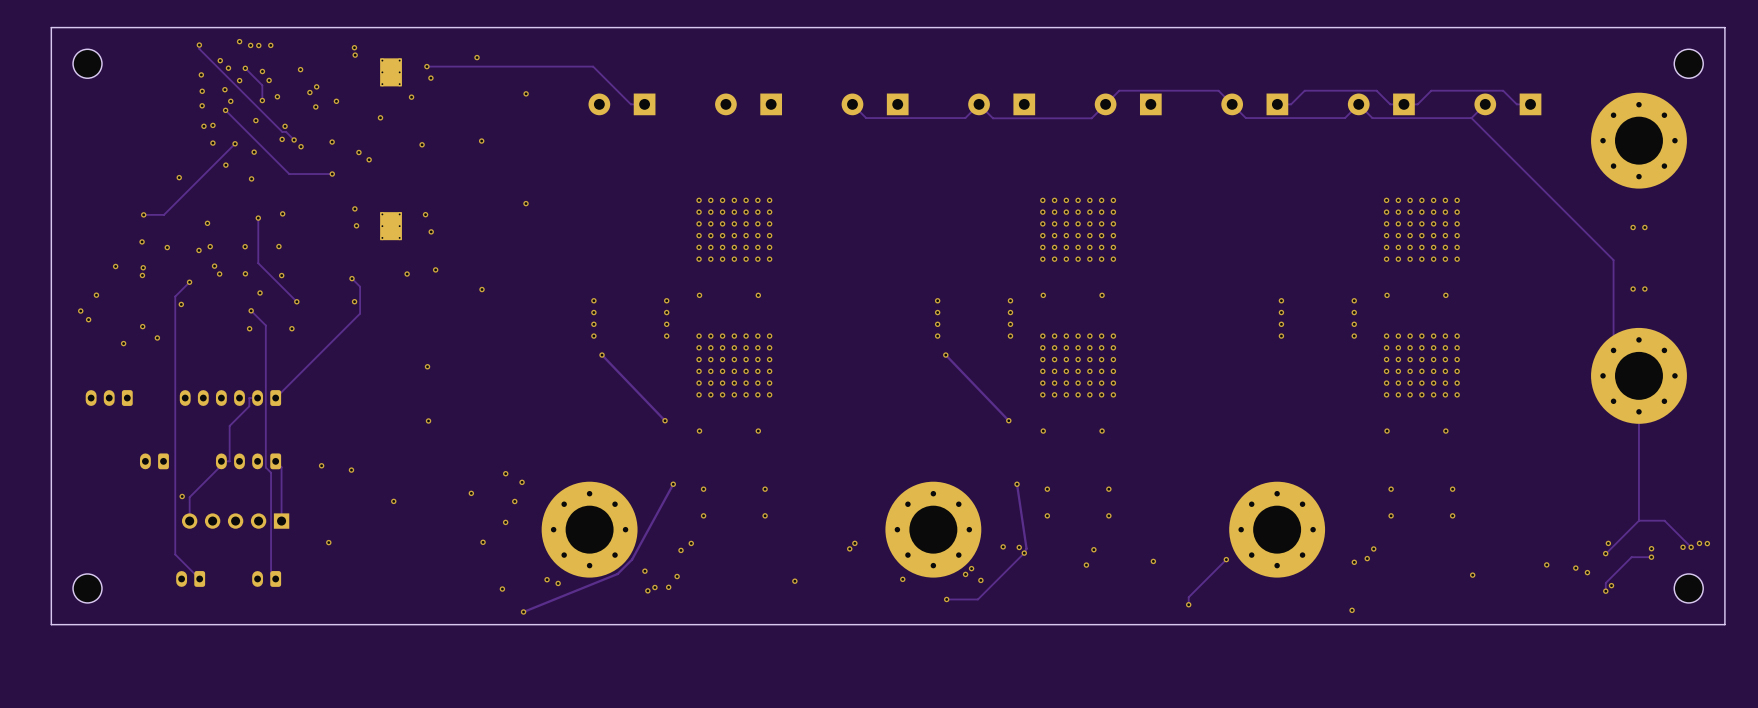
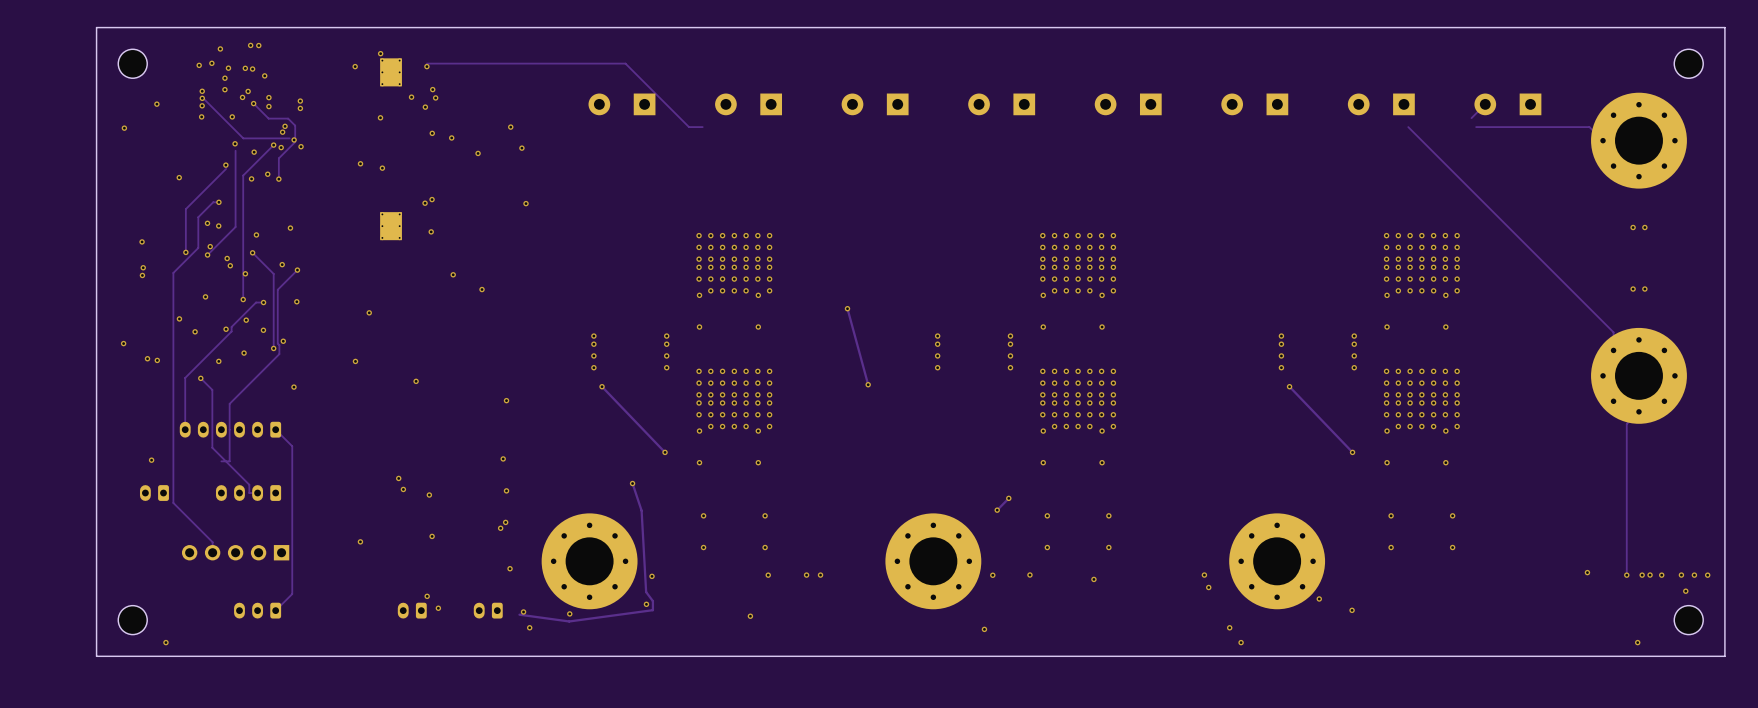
board edge: (96, 27) (51, 27) (51, 624) (1724, 624) -> (96, 27) (96, 656) (1724, 656) (1724, 624)
via: (239, 41) -> none
track: (199, 45) (199, 48) (282, 131) (286, 131) (294, 139) -> none
via: (199, 45) -> none
via: (270, 45) -> none
via: (354, 47) -> none
via: none -> (220, 48)
via: none -> (380, 53)
via: (355, 55) -> none
via: (477, 57) -> none
via: (220, 60) -> none
part position: (87, 63) -> (132, 63)
via: none -> (211, 63)
track: none -> (427, 63) (625, 63) (689, 127) (702, 127)
via: none -> (199, 65)
via: none -> (355, 66)
track: (426, 66) (593, 66) (630, 104) (644, 104) -> none
track: (245, 68) (262, 85) (262, 100) -> none
via: none -> (252, 69)
via: (300, 69) -> none
via: (262, 71) -> none
via: (201, 74) -> none
via: none -> (264, 75)
via: none -> (224, 78)
via: (430, 78) -> none
via: (239, 80) -> none
via: (269, 80) -> none
via: (316, 86) -> none
via: none -> (432, 89)
via: none -> (248, 91)
via: (309, 92) -> none
via: (526, 93) -> none
via: (277, 96) -> none
via: none -> (242, 97)
via: none -> (268, 97)
via: none -> (435, 97)
track: none -> (202, 98) (243, 138) (289, 138)
via: none -> (202, 98)
via: (262, 100) -> none
via: (230, 101) -> none
via: none -> (300, 101)
via: (336, 101) -> none
track: none -> (253, 103) (268, 118) (288, 118) (295, 125) (295, 142) (278, 158) (278, 179)
via: none -> (253, 103)
via: none -> (156, 104)
track: (852, 104) (866, 118) (965, 118) (979, 104) (992, 118) (1091, 118) (1119, 90) (1218, 90) (1245, 118) (1345, 118) (1358, 104) (1372, 118) (1471, 118) (1613, 260) (1613, 332) -> (1408, 127) (1613, 332)
track: (1530, 104) (1516, 104) (1503, 90) (1431, 90) (1417, 104) (1390, 104) (1376, 90) (1304, 90) (1291, 104) (1277, 104) -> none
via: none -> (268, 106)
via: (315, 106) -> none
via: none -> (425, 107)
via: none -> (300, 108)
track: (225, 110) (289, 174) (332, 174) -> none
via: (225, 110) -> none
via: none -> (201, 116)
via: none -> (232, 116)
via: (255, 120) -> none
via: (212, 125) -> none
via: (203, 126) -> none
via: none -> (510, 127)
track: none -> (1476, 127) (1589, 127) (1603, 140)
via: none -> (124, 128)
via: none -> (282, 132)
via: none -> (432, 133)
via: none -> (451, 137)
via: (282, 139) -> none
via position: (481, 141) -> (478, 153)
via: (332, 142) -> none
via: (212, 143) -> none
track: (235, 143) (163, 214) (143, 214) -> none
via: (422, 144) -> none
track: none -> (273, 145) (243, 175) (243, 299)
via: none -> (273, 145)
via: none -> (281, 147)
via: none -> (521, 148)
track: none -> (235, 150) (235, 227) (207, 255)
via: (358, 152) -> none
via: (369, 159) -> none
via: none -> (360, 163)
track: none -> (226, 168) (185, 209) (185, 252)
via: none -> (382, 168)
via: none -> (267, 174)
via: (332, 174) -> none
via: none -> (278, 179)
via: none -> (432, 199)
via: (699, 200) -> none
via: (710, 200) -> none
via: (722, 200) -> none
via: (734, 200) -> none
via: (746, 200) -> none
via: (757, 200) -> none
via: (769, 200) -> none
via: (1042, 200) -> none
via: (1054, 200) -> none
via: (1066, 200) -> none
via: (1078, 200) -> none
via: (1089, 200) -> none
via: (1101, 200) -> none
via: (1113, 200) -> none
via: (1386, 200) -> none
via: (1398, 200) -> none
via: (1410, 200) -> none
via: (1421, 200) -> none
via: (1433, 200) -> none
via: (1445, 200) -> none
via: (1457, 200) -> none
track: none -> (218, 202) (213, 202) (198, 217) (198, 247) (173, 272) (173, 502) (212, 542) (212, 552)
via: none -> (218, 202)
via: none -> (425, 203)
via: (354, 208) -> none
via: (699, 212) -> none
via: (710, 212) -> none
via: (722, 212) -> none
via: (734, 212) -> none
via: (746, 212) -> none
via: (757, 212) -> none
via: (769, 212) -> none
via: (1042, 212) -> none
via: (1054, 212) -> none
via: (1066, 212) -> none
via: (1078, 212) -> none
via: (1089, 212) -> none
via: (1101, 212) -> none
via: (1113, 212) -> none
via: (1386, 212) -> none
via: (1398, 212) -> none
via: (1410, 212) -> none
via: (1421, 212) -> none
via: (1433, 212) -> none
via: (1445, 212) -> none
via: (1457, 212) -> none
via: (282, 213) -> none
via: (143, 214) -> none
via: (425, 214) -> none
track: (258, 218) (258, 263) (296, 301) -> none
via: (258, 218) -> none
via: (699, 223) -> none
via: (710, 223) -> none
via: (722, 223) -> none
via: (734, 223) -> none
via: (746, 223) -> none
via: (757, 223) -> none
via: (769, 223) -> none
via: (1042, 223) -> none
via: (1054, 223) -> none
via: (1066, 223) -> none
via: (1078, 223) -> none
via: (1089, 223) -> none
via: (1101, 223) -> none
via: (1113, 223) -> none
via: (1386, 223) -> none
via: (1398, 223) -> none
via: (1410, 223) -> none
via: (1421, 223) -> none
via: (1433, 223) -> none
via: (1445, 223) -> none
via: (1457, 223) -> none
via: (356, 225) -> none
via: none -> (218, 226)
via: none -> (290, 228)
via: none -> (256, 234)
via: (245, 246) -> none
via: (278, 246) -> none
via: (167, 247) -> none
via: (199, 250) -> none
via: none -> (185, 252)
track: none -> (252, 252) (273, 273) (273, 348)
via: none -> (252, 252)
via: none -> (207, 255)
via: none -> (227, 258)
via: none -> (282, 264)
via: none -> (230, 265)
via: (115, 266) -> none
via: (214, 266) -> none
via: none -> (699, 267)
via: none -> (710, 267)
via: none -> (722, 267)
via: none -> (734, 267)
via: none -> (746, 267)
via: none -> (757, 267)
via: none -> (769, 267)
via: none -> (1042, 267)
via: none -> (1054, 267)
via: none -> (1066, 267)
via: none -> (1078, 267)
via: none -> (1089, 267)
via: none -> (1101, 267)
via: none -> (1113, 267)
via: none -> (1386, 267)
via: none -> (1398, 267)
via: none -> (1410, 267)
via: none -> (1421, 267)
via: none -> (1433, 267)
via: none -> (1445, 267)
via: none -> (1457, 267)
via position: (435, 269) -> (453, 274)
via: none -> (297, 270)
via: (219, 274) -> none
via: (407, 274) -> none
via: (281, 275) -> none
track: (352, 278) (360, 286) (360, 313) (275, 398) -> none
via: (352, 278) -> none
via: none -> (699, 279)
via: none -> (710, 279)
via: none -> (722, 279)
via: none -> (734, 279)
via: none -> (746, 279)
via: none -> (757, 279)
via: none -> (769, 279)
via: none -> (1042, 279)
via: none -> (1054, 279)
via: none -> (1066, 279)
via: none -> (1078, 279)
via: none -> (1089, 279)
via: none -> (1101, 279)
via: none -> (1113, 279)
via: none -> (1386, 279)
via: none -> (1398, 279)
via: none -> (1410, 279)
via: none -> (1421, 279)
via: none -> (1433, 279)
via: none -> (1445, 279)
via: none -> (1457, 279)
track: (189, 282) (175, 296) (175, 554) (199, 578) -> none
via: (189, 282) -> none
via: none -> (710, 290)
via: none -> (722, 290)
via: none -> (734, 290)
via: none -> (746, 290)
via: none -> (769, 290)
via: none -> (1054, 290)
via: none -> (1066, 290)
via: none -> (1078, 290)
via: none -> (1089, 290)
via: none -> (1113, 290)
via: none -> (1398, 290)
via: none -> (1410, 290)
via: none -> (1421, 290)
via: none -> (1433, 290)
via: none -> (1457, 290)
via: (260, 292) -> none
via: (96, 295) -> none
via: none -> (205, 296)
via: none -> (243, 299)
via: (593, 300) -> none
via: (666, 300) -> none
via: (937, 300) -> none
via: (1010, 300) -> none
via: (1281, 300) -> none
via: (1354, 300) -> none
via position: (354, 301) -> (369, 312)
track: none -> (263, 302) (256, 302) (231, 326) (231, 331) (185, 377) (185, 429)
via: none -> (263, 302)
via: (181, 304) -> none
track: none -> (847, 308) (868, 384)
via: none -> (847, 308)
track: (251, 310) (265, 325) (265, 467) (271, 472) (271, 574) (275, 578) -> none
via: (251, 310) -> none
via: (80, 311) -> none
via: (593, 312) -> none
via: (666, 312) -> none
via: (937, 312) -> none
via: (1010, 312) -> none
via: (1281, 312) -> none
via: (1354, 312) -> none
via: none -> (179, 318)
via: (88, 319) -> none
via: none -> (246, 320)
via: (593, 324) -> none
via: (666, 324) -> none
via: (937, 324) -> none
via: (1010, 324) -> none
via: (1281, 324) -> none
via: (1354, 324) -> none
via: (142, 326) -> none
via: none -> (699, 327)
via: none -> (758, 327)
via: none -> (1043, 327)
via: none -> (1102, 327)
via: none -> (1387, 327)
via: none -> (1445, 327)
via: (249, 328) -> none
via: (291, 328) -> none
via: none -> (226, 329)
via: none -> (263, 330)
via: none -> (195, 331)
via: (699, 336) -> none
via: (710, 336) -> none
via: (722, 336) -> none
via: (734, 336) -> none
via: (746, 336) -> none
via: (757, 336) -> none
via: (769, 336) -> none
via: (1042, 336) -> none
via: (1054, 336) -> none
via: (1066, 336) -> none
via: (1078, 336) -> none
via: (1089, 336) -> none
via: (1101, 336) -> none
via: (1113, 336) -> none
via: (1386, 336) -> none
via: (1398, 336) -> none
via: (1410, 336) -> none
via: (1421, 336) -> none
via: (1433, 336) -> none
via: (1445, 336) -> none
via: (1457, 336) -> none
via: (157, 337) -> none
via: none -> (283, 341)
via: none -> (593, 344)
via: none -> (666, 344)
via: none -> (937, 344)
via: none -> (1010, 344)
via: none -> (1281, 344)
via: none -> (1354, 344)
via: (699, 347) -> none
via: (710, 347) -> none
via: (722, 347) -> none
via: (734, 347) -> none
via: (746, 347) -> none
via: (757, 347) -> none
via: (769, 347) -> none
via: (1042, 347) -> none
via: (1054, 347) -> none
via: (1066, 347) -> none
via: (1078, 347) -> none
via: (1089, 347) -> none
via: (1101, 347) -> none
via: (1113, 347) -> none
via: (1386, 347) -> none
via: (1398, 347) -> none
via: (1410, 347) -> none
via: (1421, 347) -> none
via: (1433, 347) -> none
via: (1445, 347) -> none
via: (1457, 347) -> none
via: none -> (273, 348)
via: none -> (244, 353)
via: none -> (593, 355)
track: (602, 355) (665, 420) -> (602, 386) (665, 452)
via: (602, 355) -> none
via: none -> (666, 355)
via: none -> (937, 355)
track: (945, 355) (1008, 420) -> none
via: (945, 355) -> none
via: none -> (1010, 355)
via: none -> (1281, 355)
via: none -> (1354, 355)
via: none -> (147, 358)
via: (699, 359) -> none
via: (710, 359) -> none
via: (722, 359) -> none
via: (734, 359) -> none
via: (746, 359) -> none
via: (757, 359) -> none
via: (769, 359) -> none
via: (1042, 359) -> none
via: (1054, 359) -> none
via: (1066, 359) -> none
via: (1078, 359) -> none
via: (1089, 359) -> none
via: (1101, 359) -> none
via: (1113, 359) -> none
via: (1386, 359) -> none
via: (1398, 359) -> none
via: (1410, 359) -> none
via: (1421, 359) -> none
via: (1433, 359) -> none
via: (1445, 359) -> none
via: (1457, 359) -> none
via: none -> (157, 360)
via: none -> (218, 361)
via: none -> (355, 361)
via position: (427, 366) -> (416, 381)
via: none -> (593, 367)
via: none -> (666, 367)
via: none -> (937, 367)
via: none -> (1010, 367)
via: none -> (1281, 367)
via: none -> (1354, 367)
track: none -> (200, 378) (212, 389) (212, 447) (249, 484) (249, 493) (257, 493)
via: none -> (200, 378)
via: none -> (868, 384)
via: none -> (602, 386)
track: none -> (1289, 386) (1352, 452)
via: none -> (1289, 386)
via: none -> (293, 387)
part: (109, 398) -> none
part position: (230, 398) -> (230, 429)
track: (257, 398) (249, 398) (249, 406) (229, 425) -> (297, 270) (277, 289) (279, 354) (229, 403) (229, 425)
via: none -> (506, 400)
via: none -> (699, 403)
via: none -> (710, 403)
via: none -> (722, 403)
via: none -> (734, 403)
via: none -> (746, 403)
via: none -> (757, 403)
via: none -> (769, 403)
via: none -> (1042, 403)
via: none -> (1054, 403)
via: none -> (1066, 403)
via: none -> (1078, 403)
via: none -> (1089, 403)
via: none -> (1101, 403)
via: none -> (1113, 403)
via: none -> (1386, 403)
via: none -> (1398, 403)
via: none -> (1410, 403)
via: none -> (1421, 403)
via: none -> (1433, 403)
via: none -> (1445, 403)
via: none -> (1457, 403)
track: (1638, 411) (1638, 520) -> (1638, 411) (1626, 424) (1626, 575)
via: none -> (699, 414)
via: none -> (710, 414)
via: none -> (722, 414)
via: none -> (734, 414)
via: none -> (746, 414)
via: none -> (757, 414)
via: none -> (769, 414)
via: none -> (1042, 414)
via: none -> (1054, 414)
via: none -> (1066, 414)
via: none -> (1078, 414)
via: none -> (1089, 414)
via: none -> (1101, 414)
via: none -> (1113, 414)
via: none -> (1386, 414)
via: none -> (1398, 414)
via: none -> (1410, 414)
via: none -> (1421, 414)
via: none -> (1433, 414)
via: none -> (1445, 414)
via: none -> (1457, 414)
via: (428, 420) -> none
via: (665, 420) -> none
via: (1008, 420) -> none
via: none -> (710, 426)
via: none -> (722, 426)
via: none -> (734, 426)
via: none -> (746, 426)
via: none -> (769, 426)
via: none -> (1054, 426)
via: none -> (1066, 426)
via: none -> (1078, 426)
via: none -> (1089, 426)
via: none -> (1113, 426)
via: none -> (1398, 426)
via: none -> (1410, 426)
via: none -> (1421, 426)
via: none -> (1433, 426)
via: none -> (1457, 426)
track: none -> (275, 429) (292, 446) (292, 594) (275, 610)
via: none -> (665, 452)
via: none -> (1352, 452)
via: none -> (503, 458)
part position: (154, 461) -> (154, 493)
track: (225, 461) (189, 497) (189, 521) -> none
part position: (248, 461) -> (248, 493)
track: (275, 461) (281, 467) (281, 521) -> none
via: none -> (699, 462)
via: none -> (1043, 462)
via: none -> (1387, 462)
via: (321, 465) -> none
via: (351, 470) -> none
via: (505, 473) -> none
via: none -> (398, 478)
via: (522, 482) -> none
track: none -> (632, 483) (641, 510) (646, 592) (652, 601) (652, 610) (569, 621) (519, 614)
via: none -> (632, 483)
track: (673, 484) (632, 559) (617, 573) (523, 611) -> none
via: (673, 484) -> none
track: (1017, 484) (1026, 548) (1024, 553) (977, 599) (946, 599) -> none
via: (1017, 484) -> none
via: none -> (403, 489)
via: (703, 489) -> none
via position: (765, 489) -> (758, 462)
via: (1047, 489) -> none
via position: (1108, 489) -> (1102, 462)
via: (1391, 489) -> none
via position: (1452, 489) -> (1445, 462)
via: none -> (506, 490)
via: (471, 493) -> none
via: none -> (429, 495)
via position: (182, 496) -> (151, 460)
track: none -> (1008, 498) (997, 510)
via: none -> (1008, 498)
via: (393, 501) -> none
via: (514, 501) -> none
via: none -> (997, 510)
track: (1638, 520) (1605, 553) -> none
track: (1638, 520) (1664, 520) (1691, 547) -> none
part position: (235, 521) -> (235, 552)
via: none -> (500, 528)
part position: (589, 529) -> (589, 561)
part position: (933, 529) -> (933, 561)
part position: (1277, 529) -> (1277, 561)
via: none -> (432, 536)
via: none -> (360, 541)
via: (328, 542) -> none
via: (483, 542) -> none
via: (691, 543) -> none
via: (854, 543) -> none
via: (1608, 543) -> none
via: (1699, 543) -> none
via: (1707, 543) -> none
via: (1003, 546) -> none
via: none -> (703, 547)
via: none -> (765, 547)
via: (1019, 547) -> none
via: none -> (1047, 547)
via: none -> (1108, 547)
via: none -> (1391, 547)
via: none -> (1452, 547)
via: (1683, 547) -> none
via: (1691, 547) -> none
via: (849, 548) -> none
via: (1373, 548) -> none
via: (1651, 548) -> none
via: (1093, 549) -> none
via: (681, 550) -> none
via: (1024, 553) -> none
via: (1605, 553) -> none
track: (1651, 557) (1631, 557) (1605, 583) (1605, 591) -> none
via: (1651, 557) -> none
via: (1367, 558) -> none
track: (1226, 559) (1188, 597) (1188, 604) -> none
via: (1226, 559) -> none
via: (1153, 561) -> none
via: (1354, 562) -> none
via: (1546, 564) -> none
via: (1086, 565) -> none
via: none -> (510, 568)
via: (971, 568) -> none
via: (1575, 568) -> none
via: (644, 571) -> none
via: (965, 574) -> none
via: none -> (768, 575)
via: none -> (806, 575)
via: none -> (820, 575)
via: none -> (992, 575)
via: none -> (1029, 575)
via: none -> (1204, 575)
via: (1472, 575) -> none
via: none -> (1626, 575)
via: none -> (1642, 575)
via: none -> (1650, 575)
via: none -> (1661, 575)
via: none -> (1681, 575)
via: none -> (1694, 575)
via: none -> (1707, 575)
via: none -> (652, 576)
via: (677, 576) -> none
part: (190, 578) -> none
part: (266, 578) -> none
via: (547, 579) -> none
via: (902, 579) -> none
via: none -> (1093, 579)
via: (980, 580) -> none
via: (794, 581) -> none
via: (558, 583) -> none
via: (1611, 585) -> none
via: (654, 587) -> none
via: (668, 587) -> none
via: none -> (1208, 587)
part position: (87, 588) -> (132, 620)
part position: (1688, 588) -> (1688, 620)
via: (502, 589) -> none
via: (647, 590) -> none
via: (1605, 591) -> none
via: none -> (1685, 591)
via: none -> (427, 596)
via: none -> (1319, 598)
via: (946, 599) -> none
via: none -> (646, 604)
via: (1188, 604) -> none
via: none -> (438, 608)
part: none -> (257, 610)
part: none -> (412, 610)
part: none -> (488, 610)
via: none -> (569, 613)
via: none -> (750, 616)
via: none -> (529, 627)
via: none -> (1229, 627)
via: none -> (984, 629)
via: none -> (165, 642)
via: none -> (1241, 642)
via: none -> (1637, 642)

